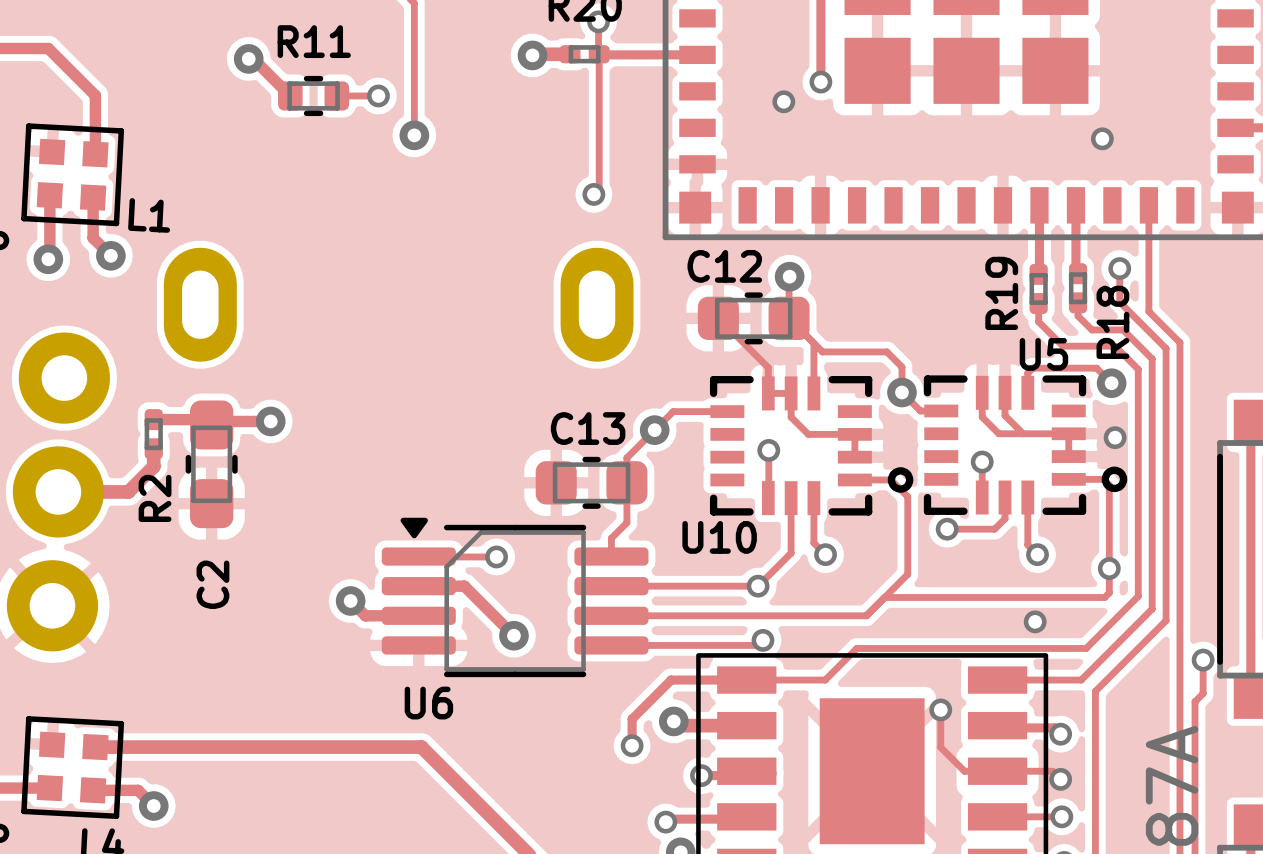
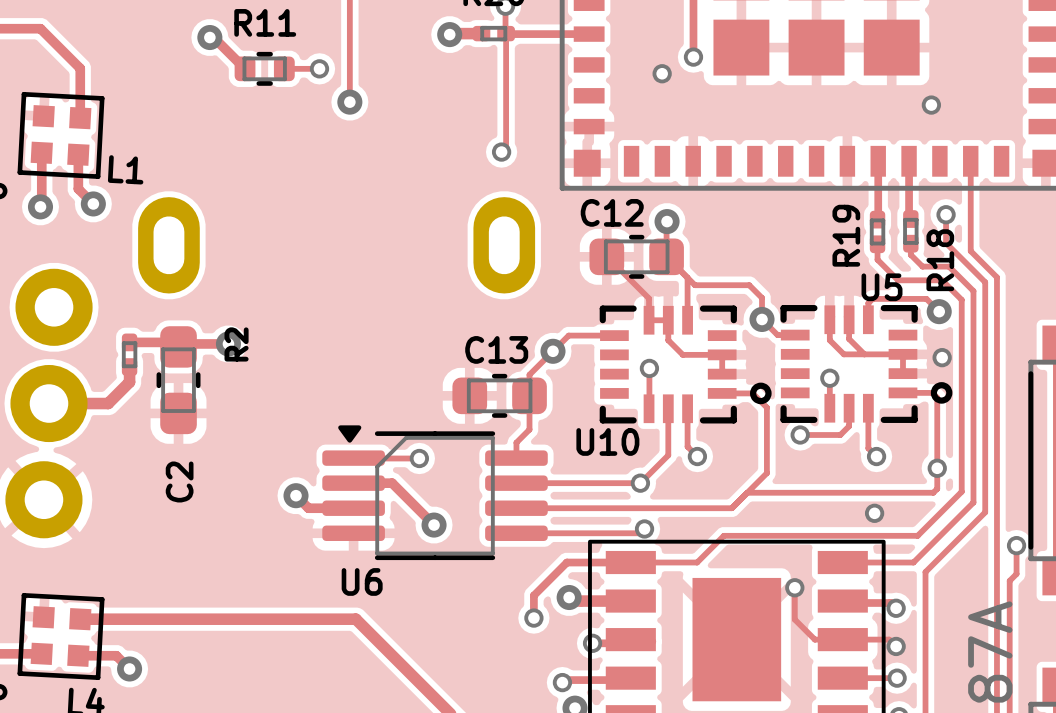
R2 name position: R2 (155, 498) -> R2 (236, 344)

